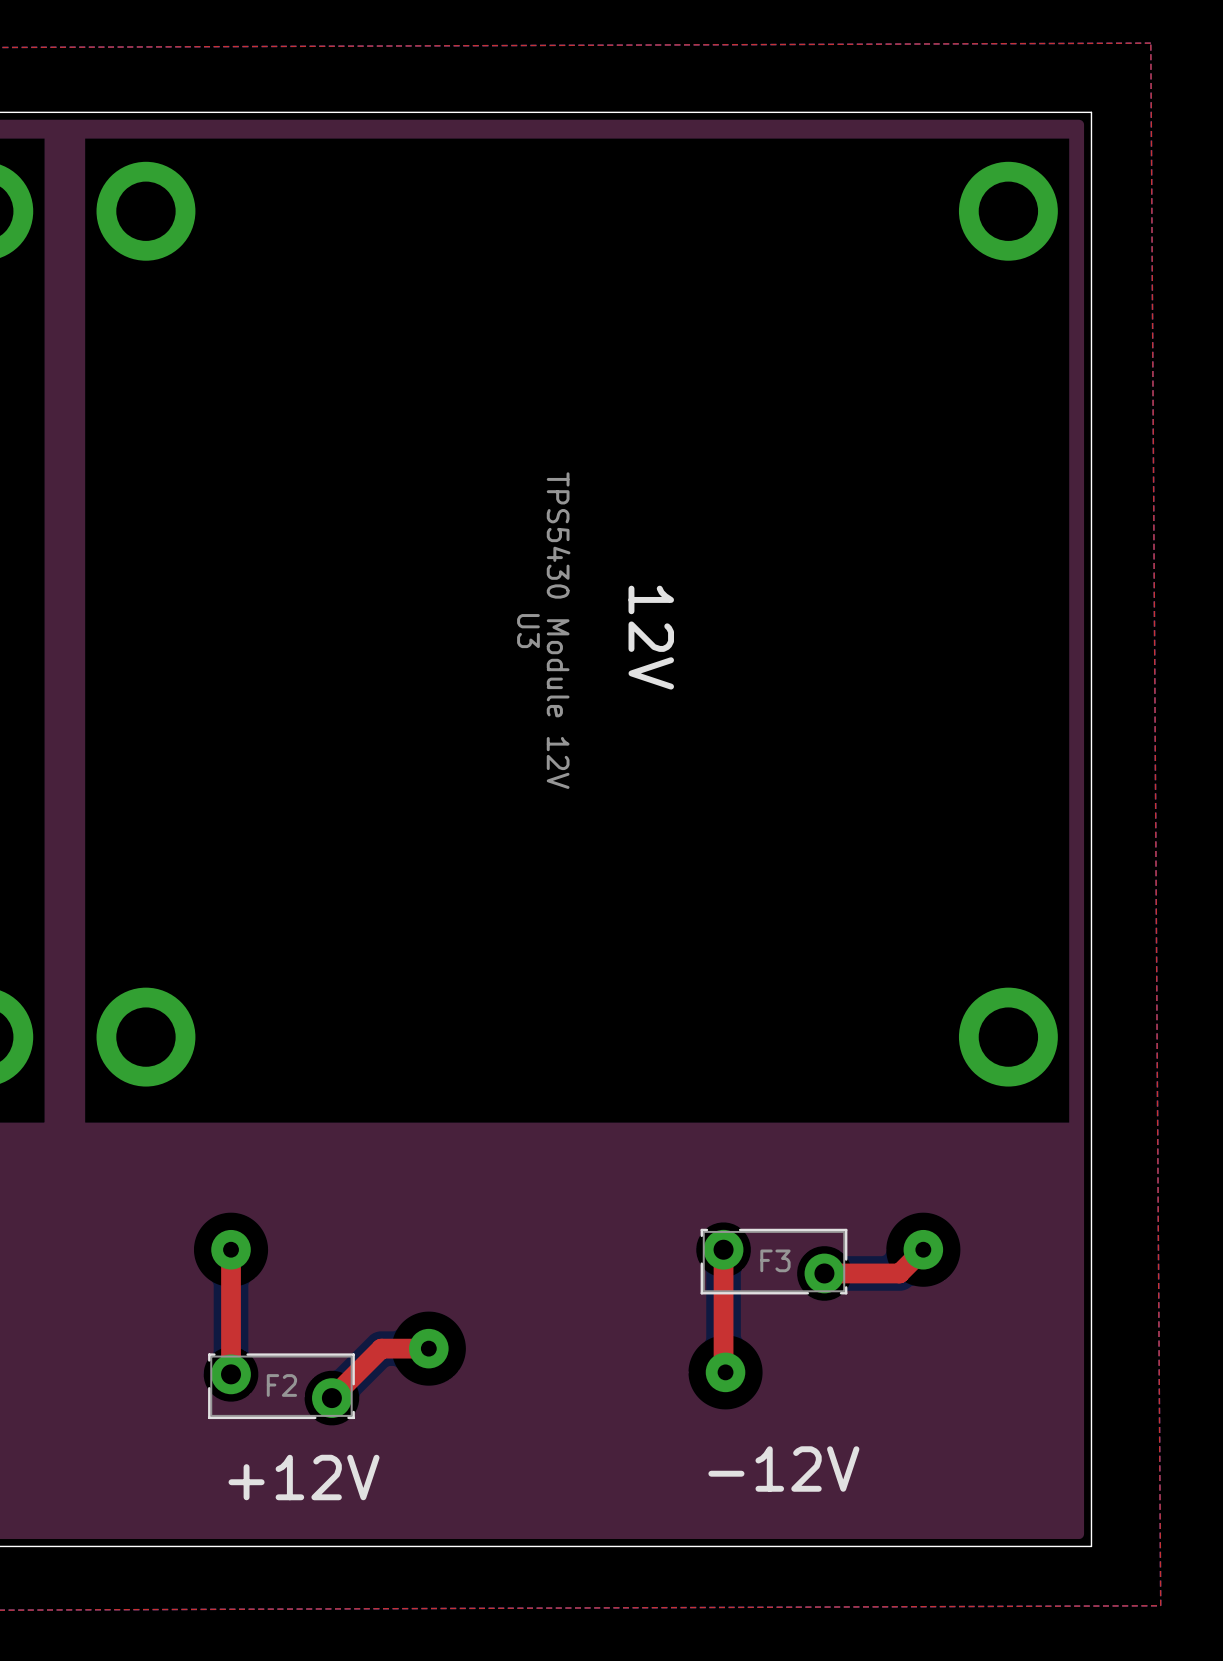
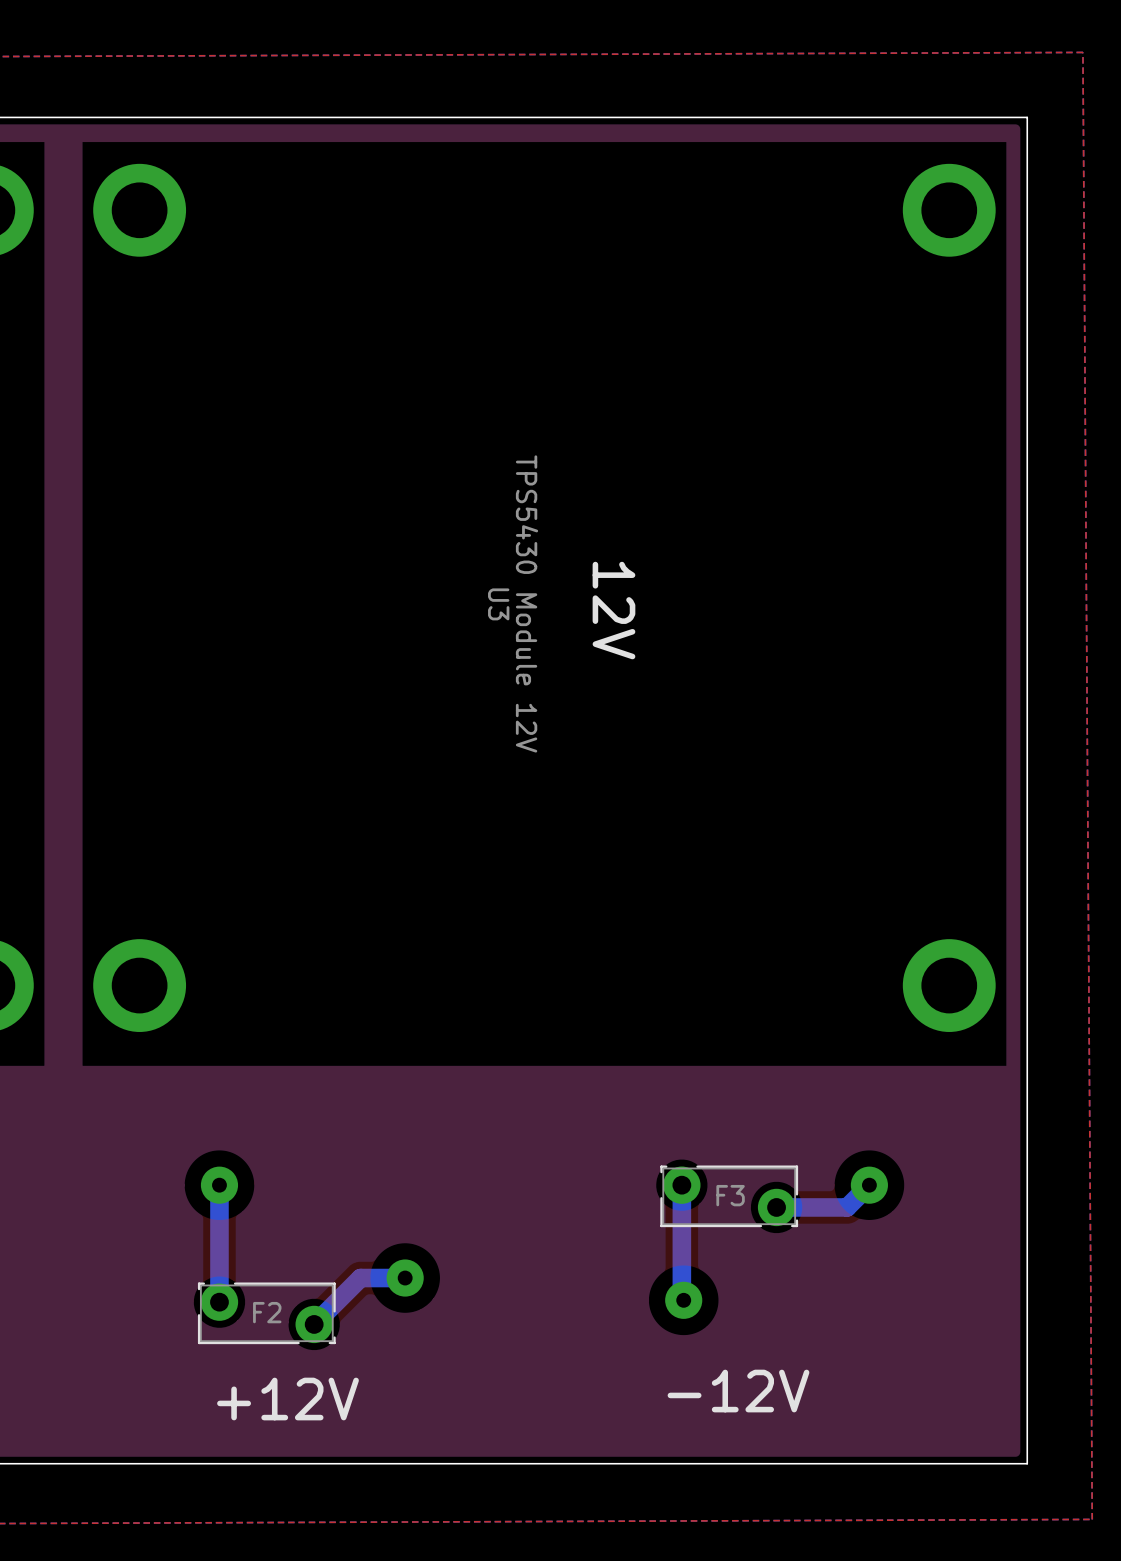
top track: (231, 1249) (231, 1374) -> none
bottom track: none -> (219, 1185) (219, 1302)
top track: (723, 1249) (723, 1370) -> none
bottom track: none -> (681, 1185) (681, 1298)
top track: (923, 1249) (899, 1273) (824, 1273) -> none
bottom track: none -> (869, 1185) (847, 1207) (776, 1207)
top track: (428, 1348) (381, 1348) (331, 1398) -> none
bottom track: none -> (405, 1278) (360, 1278) (314, 1324)

